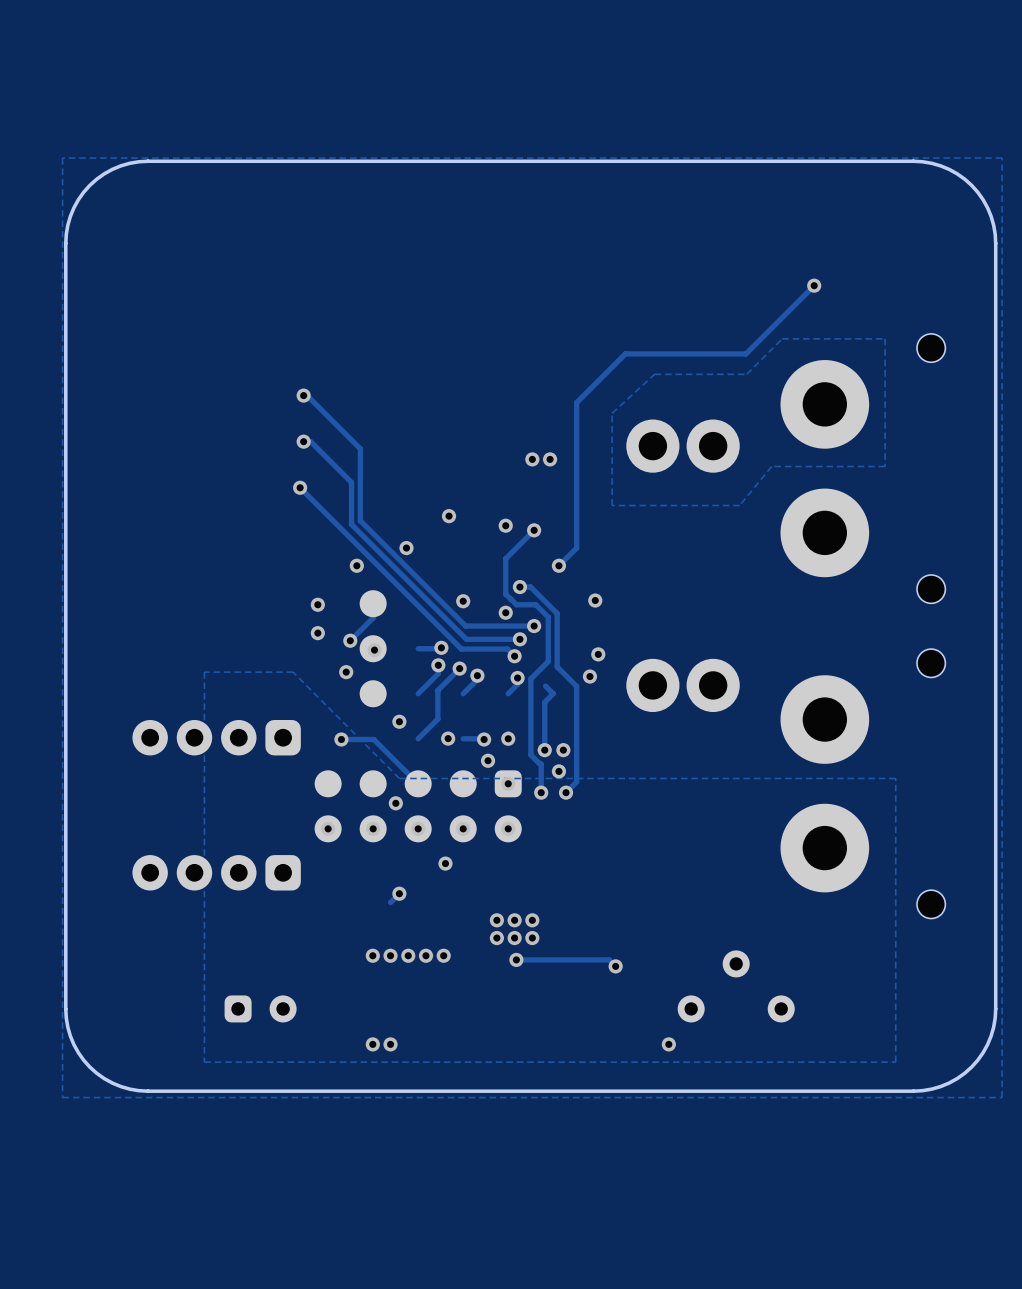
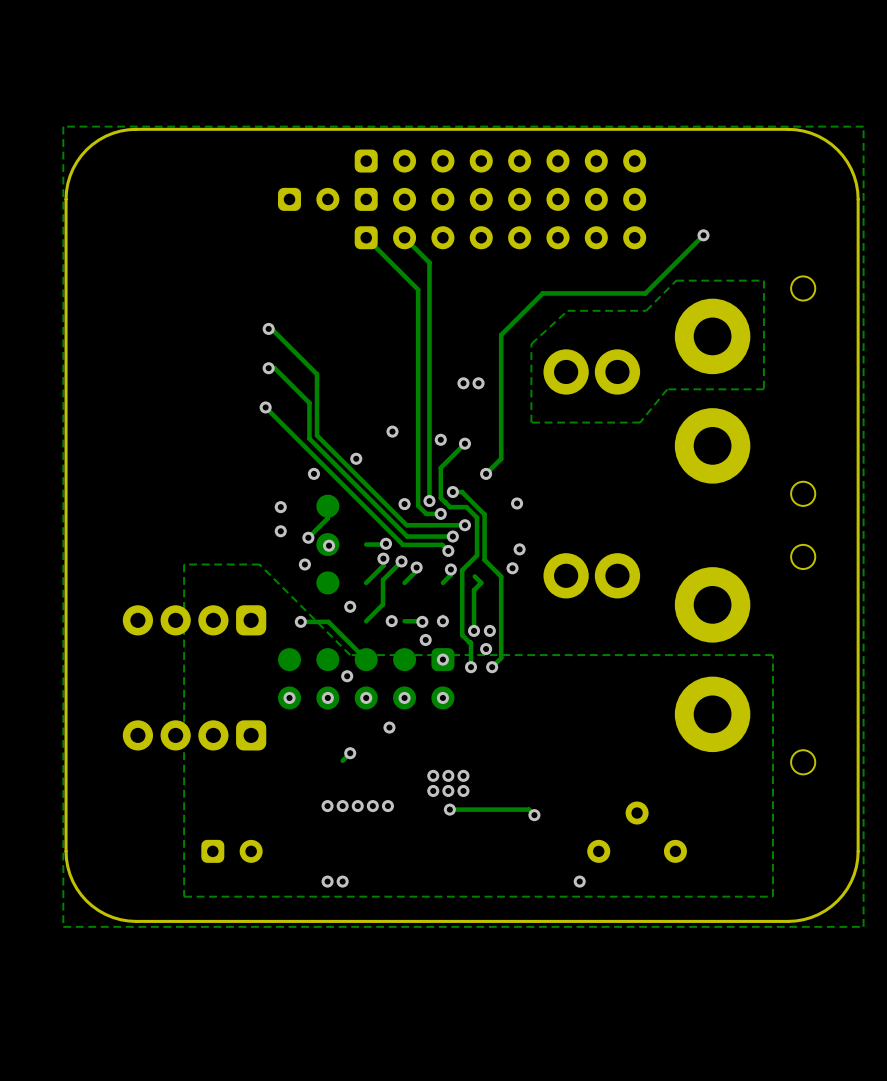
part: none -> (500, 161)
part: none -> (308, 199)
part: none -> (500, 199)
track: none -> (366, 237) (418, 289) (418, 505) (426, 513) (440, 513)
track: none -> (404, 237) (429, 262) (429, 501)
part: none -> (500, 237)
via: none -> (429, 501)

